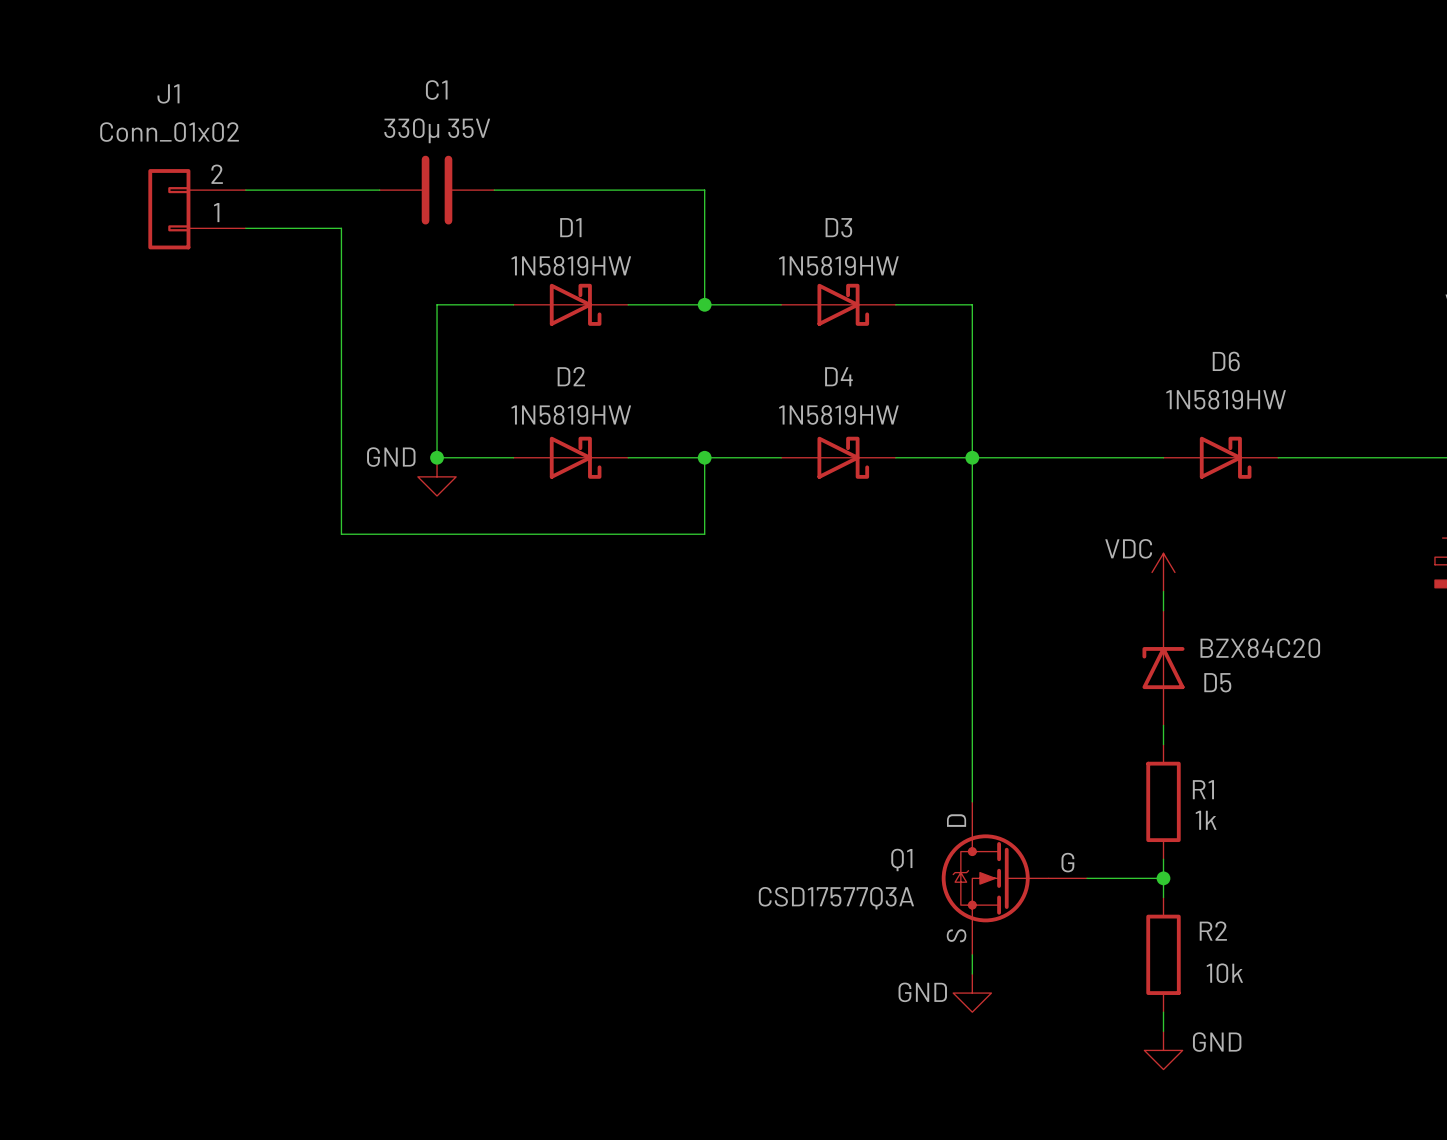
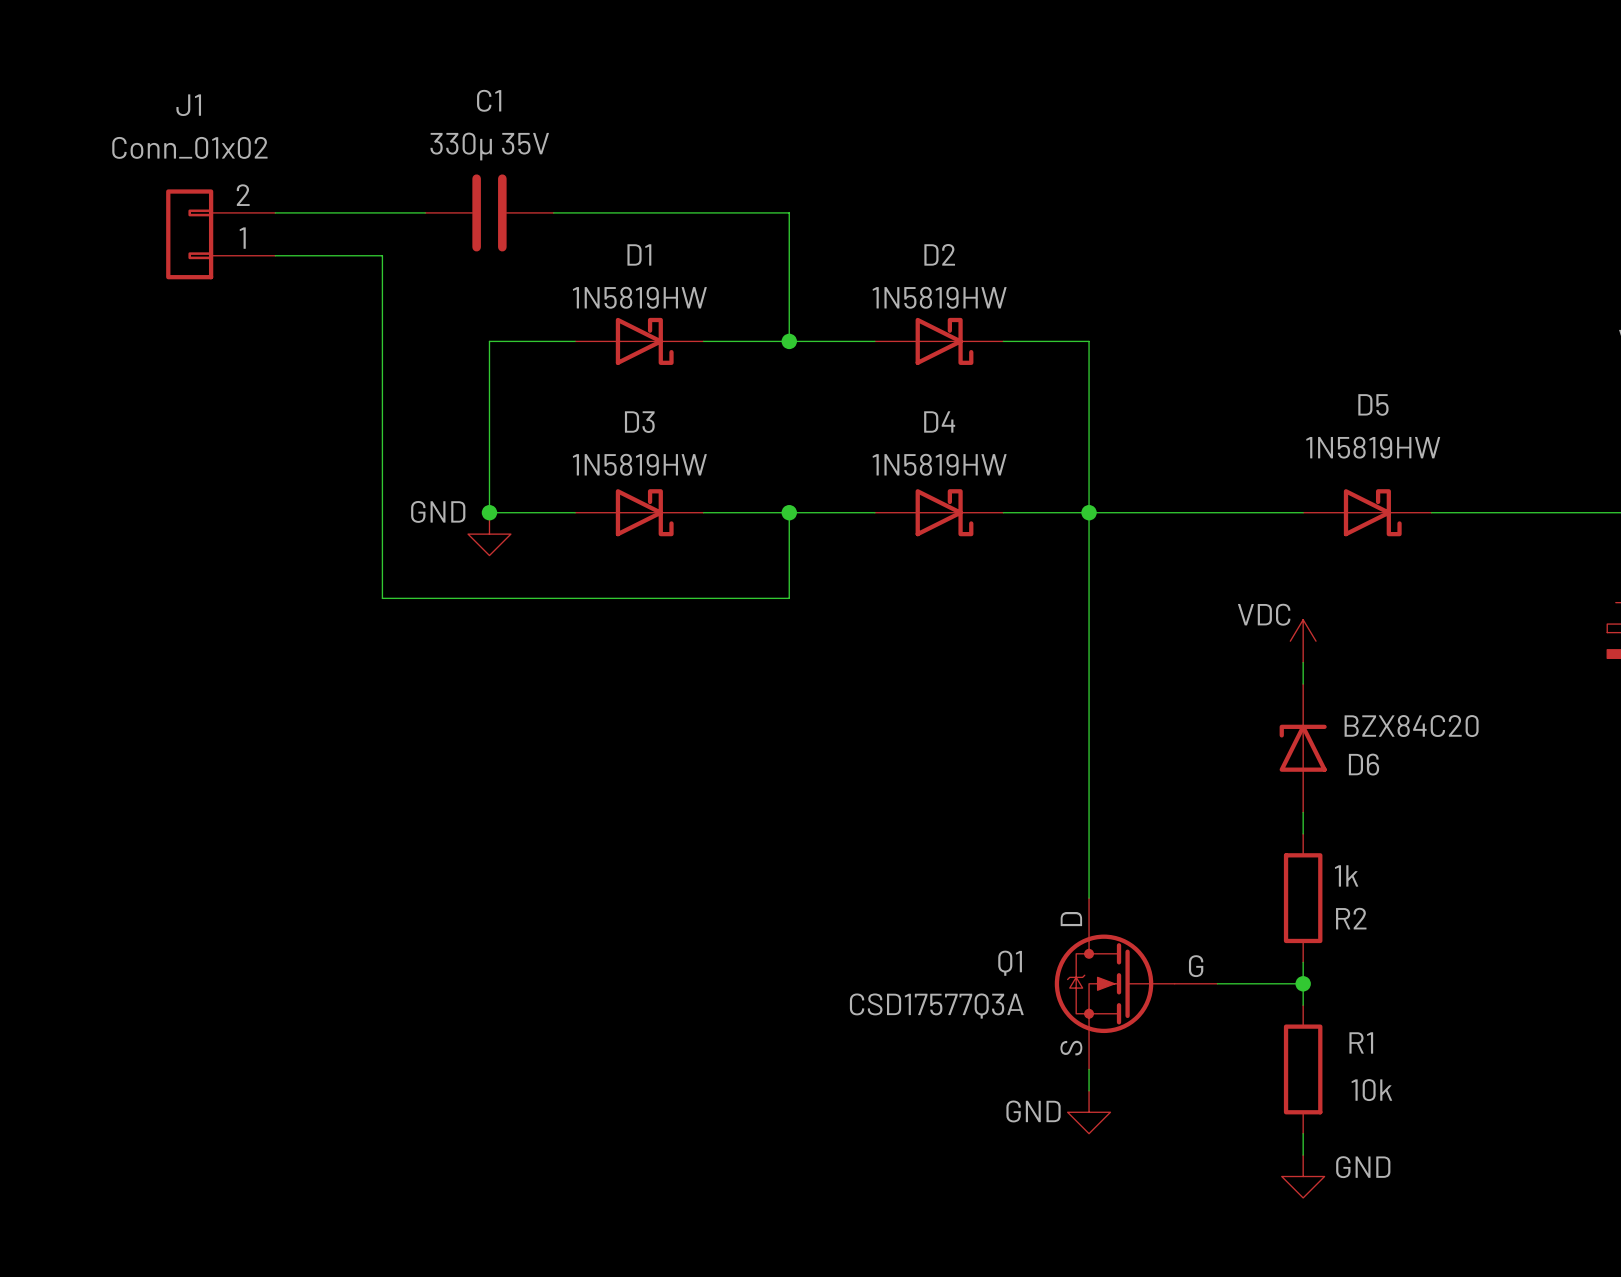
D3 name: D3 (838, 227) -> D2 (939, 254)
D6 name: D6 (1226, 361) -> D5 (1373, 404)
D2 name: D2 (571, 376) -> D3 (639, 422)
D5 name: D5 (1217, 682) -> D6 (1364, 764)
R1 name: R1 (1203, 789) -> R2 (1351, 918)
R1 value position: 1k (1206, 820) -> 1k (1346, 875)
R2 name: R2 (1213, 931) -> R1 (1361, 1042)

